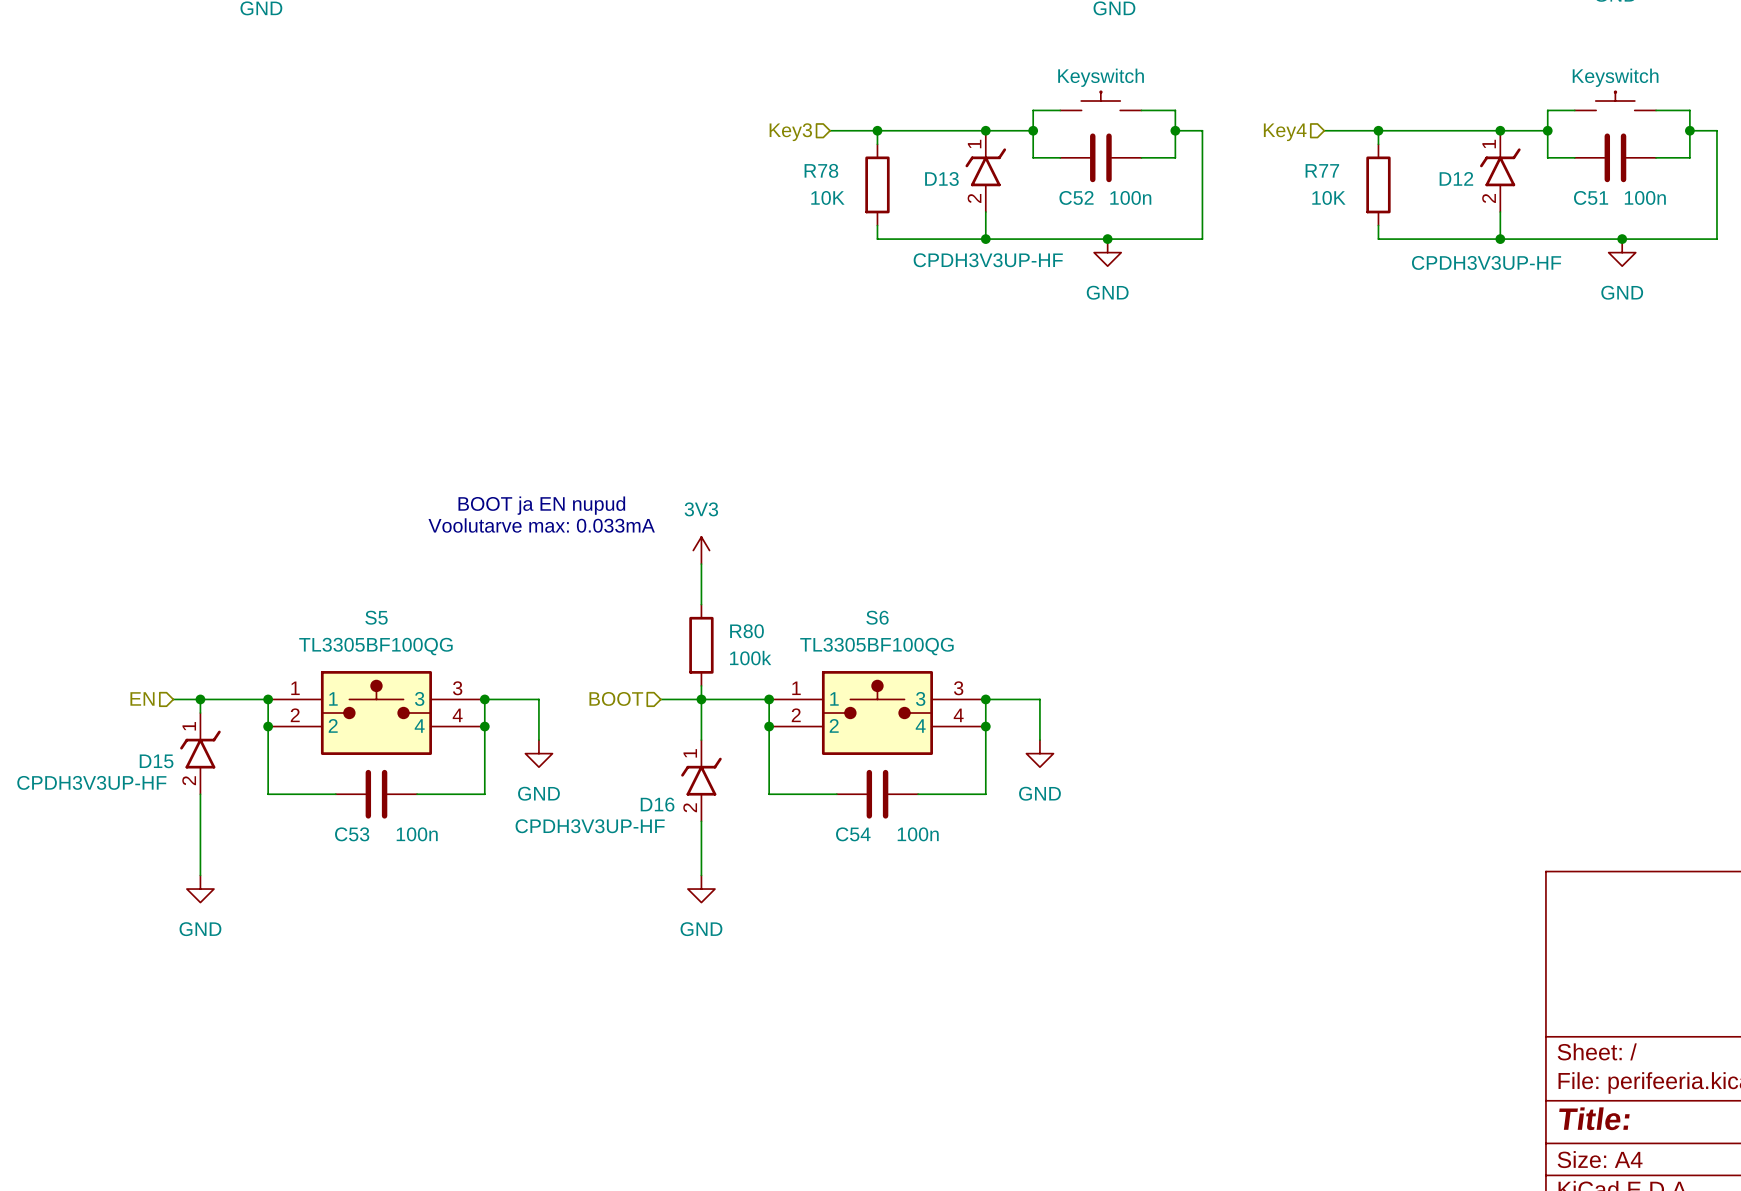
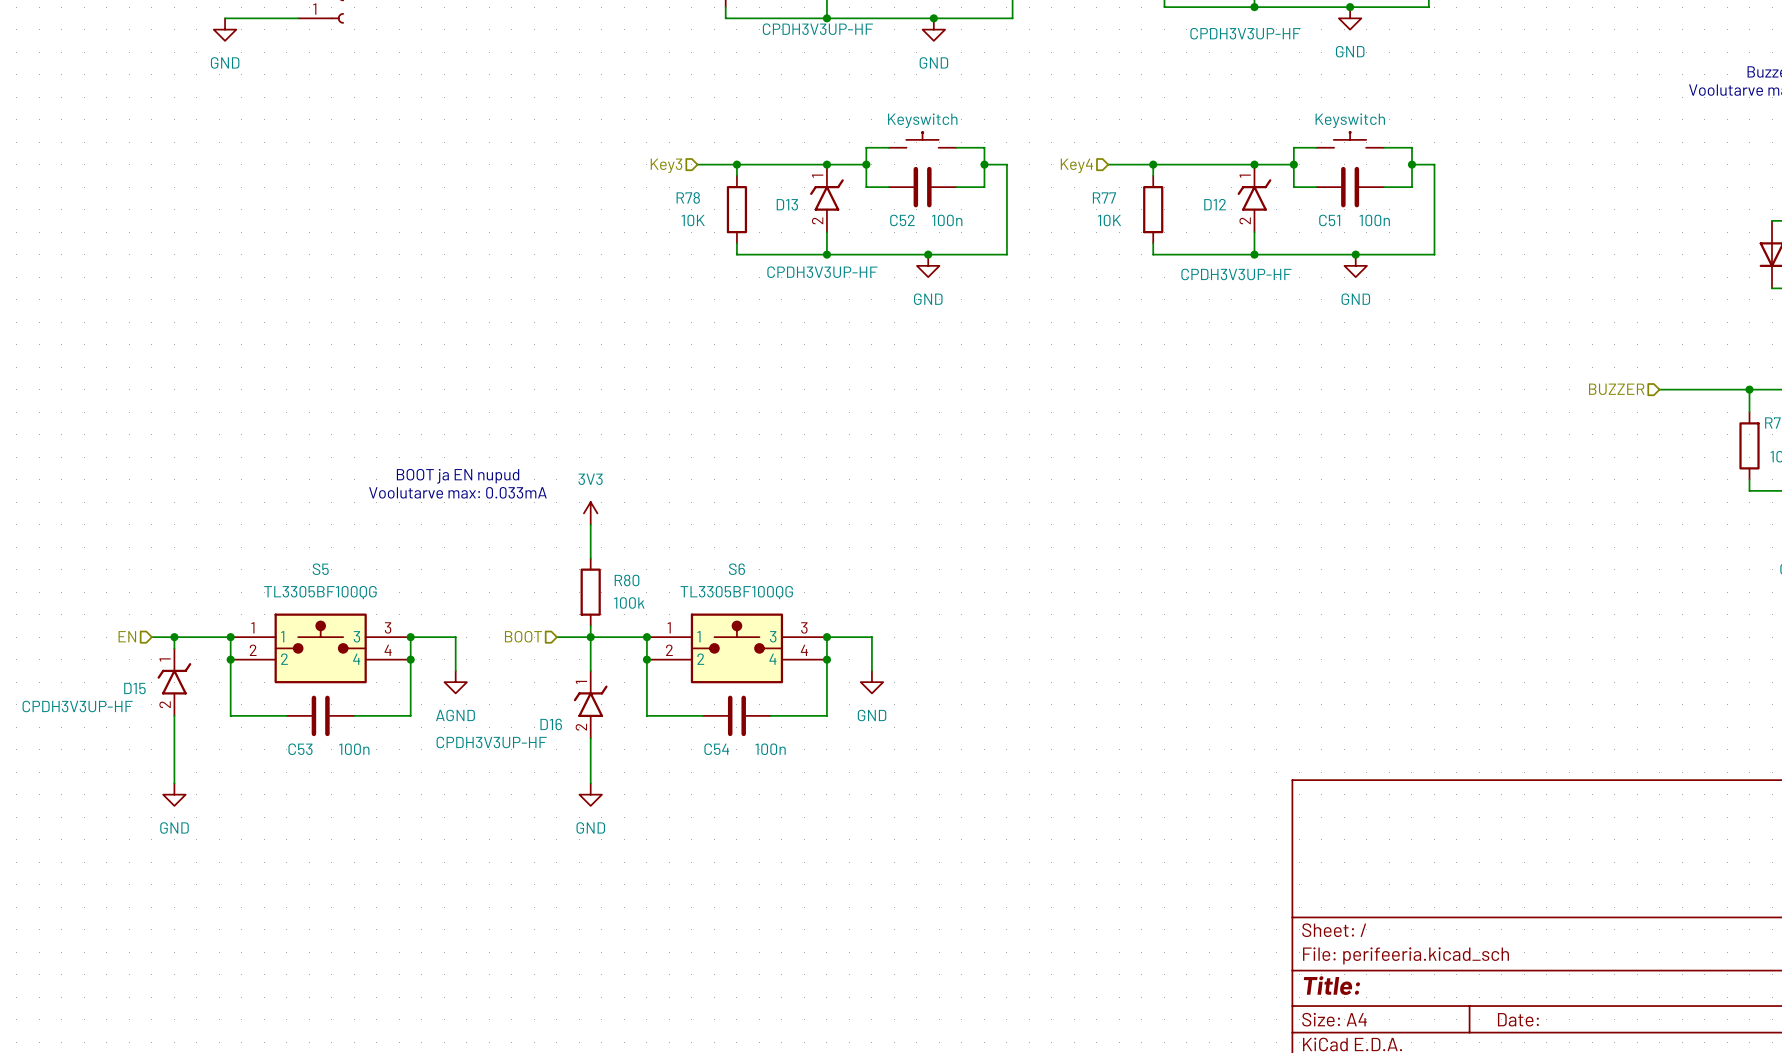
power symbol: GND (538, 753) -> AGND (455, 682)

